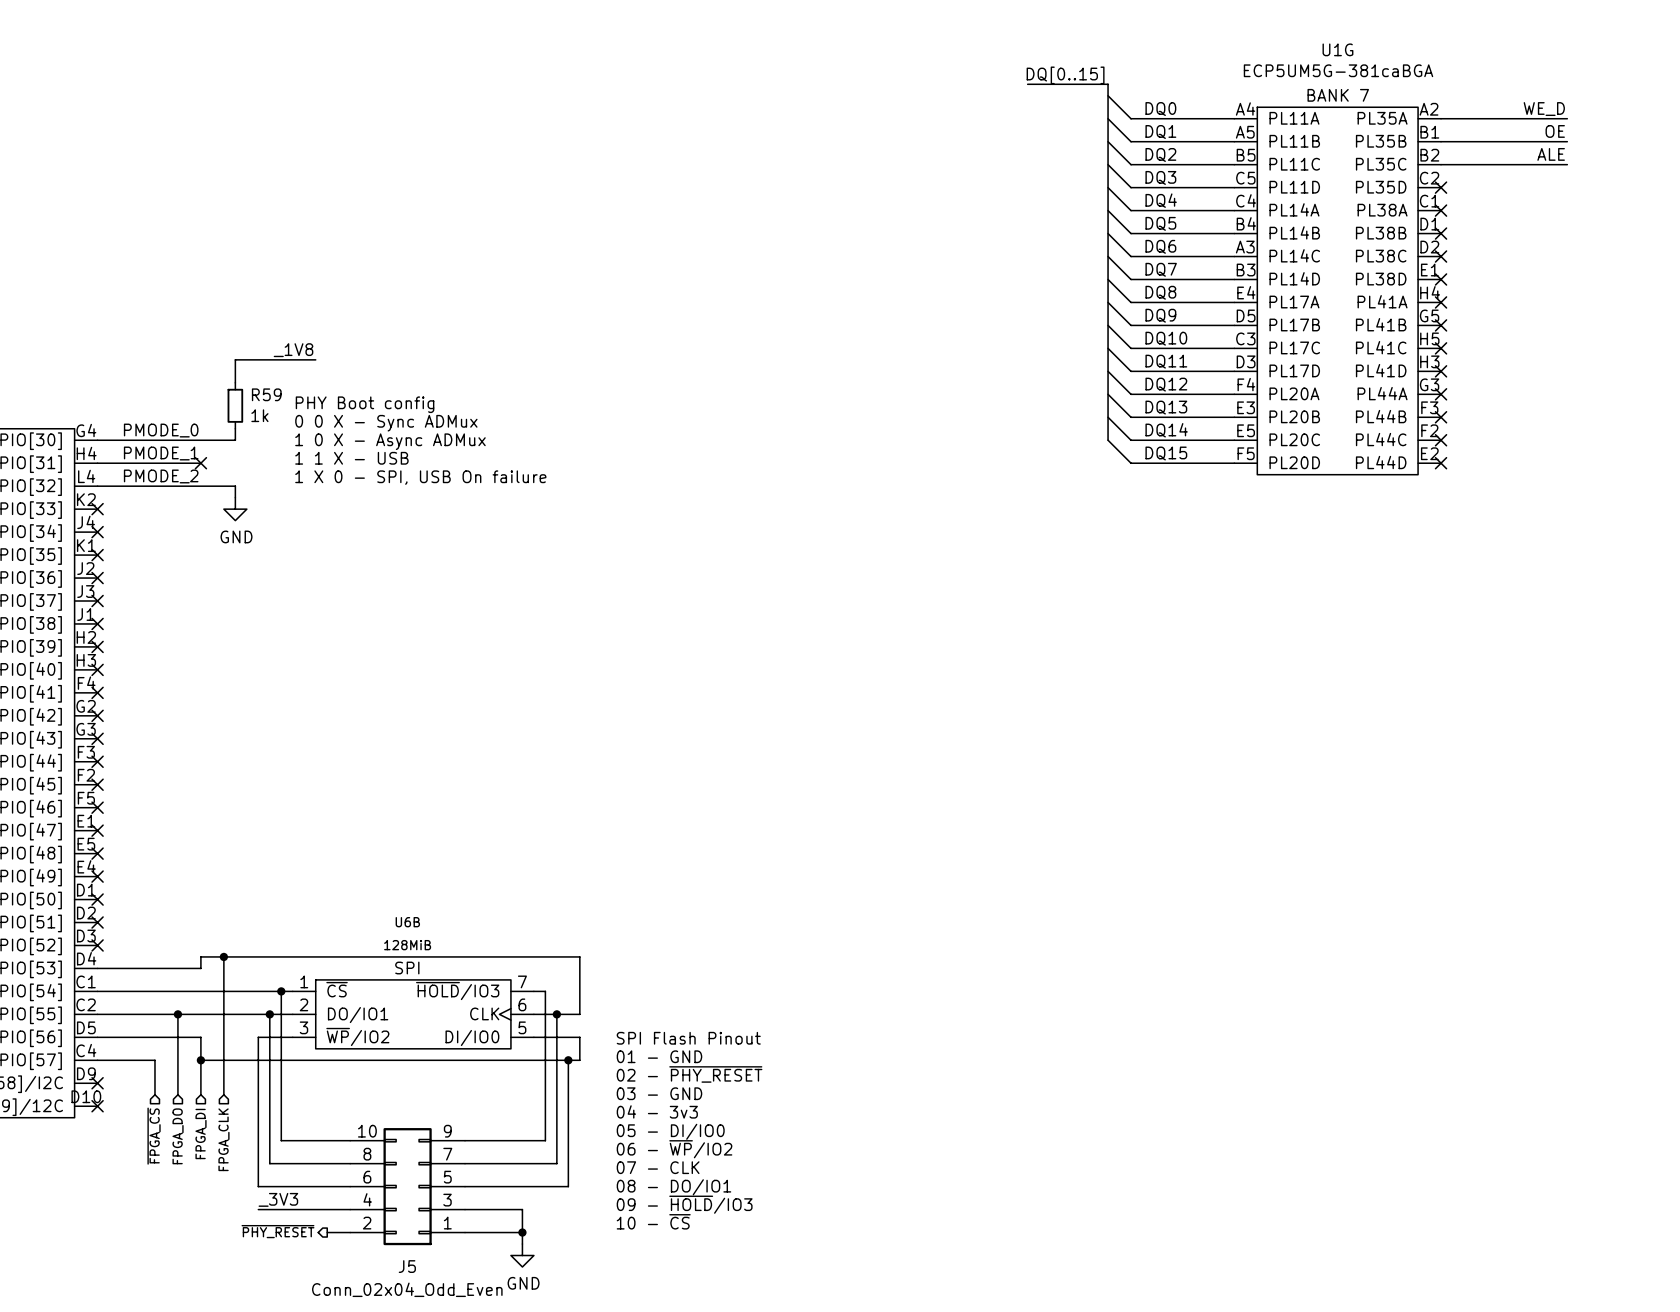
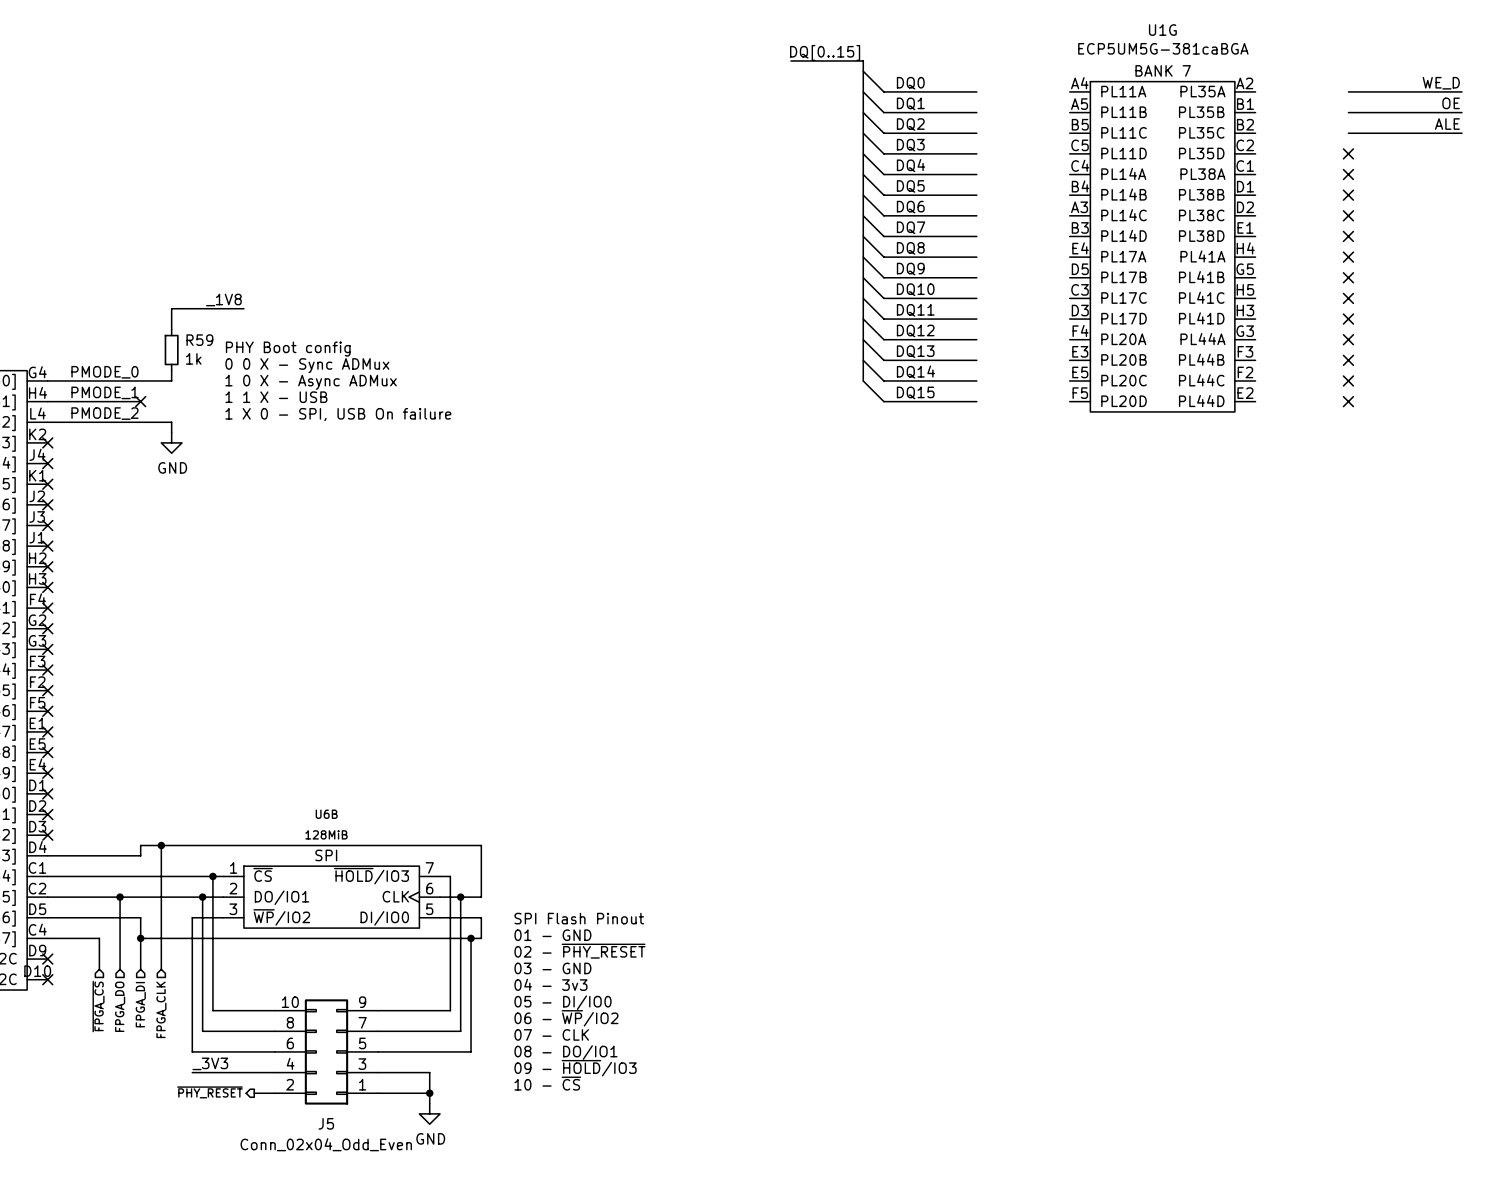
label position: DQ[0..15] (1065, 75) -> DQ[0..15] (825, 53)
bus: (1027, 84) (1108, 84) (1108, 440) -> (791, 60) (863, 60) (863, 380)
wire: (1108, 95) (1131, 118) (1234, 118) -> (863, 71) (883, 91) (976, 91)
label position: DQ0 (1160, 109) -> DQ0 (910, 83)
label position: WE_D (1544, 109) -> WE_D (1441, 83)
wire: (1108, 118) (1131, 141) (1234, 141) -> (863, 91) (883, 112) (976, 112)
wire: (1441, 118) (1544, 118) -> (1369, 91) (1461, 91)
label position: OE (1555, 131) -> OE (1451, 103)
label position: DQ1 (1160, 132) -> DQ1 (910, 103)
wire: (1108, 141) (1131, 164) (1234, 164) -> (863, 112) (883, 133) (976, 133)
wire: (1441, 141) (1544, 141) -> (1369, 112) (1461, 112)
label position: DQ2 (1160, 154) -> DQ2 (910, 124)
label position: ALE (1551, 154) -> ALE (1447, 124)
wire: (1108, 164) (1131, 187) (1234, 187) -> (863, 133) (883, 153) (976, 153)
wire: (1441, 164) (1544, 164) -> (1369, 133) (1461, 133)
label position: DQ3 (1160, 177) -> DQ3 (910, 145)
wire: (1108, 187) (1131, 210) (1234, 210) -> (863, 153) (883, 174) (976, 174)
no-connect mark: (1441, 187) -> none
no-connect mark: none -> (1348, 153)
label position: DQ4 (1161, 200) -> DQ4 (911, 165)
wire: (1108, 210) (1131, 233) (1234, 233) -> (863, 174) (883, 195) (976, 195)
no-connect mark: (1441, 210) -> none
no-connect mark: none -> (1348, 174)
label position: DQ5 (1160, 223) -> DQ5 (910, 186)
wire: (1108, 233) (1131, 256) (1234, 256) -> (863, 195) (883, 215) (976, 215)
no-connect mark: (1441, 233) -> none
no-connect mark: none -> (1348, 195)
label position: DQ6 (1160, 246) -> DQ6 (910, 207)
wire: (1108, 256) (1131, 279) (1234, 279) -> (863, 215) (883, 236) (976, 236)
no-connect mark: (1441, 256) -> none
no-connect mark: none -> (1348, 215)
label position: DQ7 (1161, 269) -> DQ7 (911, 227)
wire: (1108, 279) (1131, 302) (1234, 302) -> (863, 236) (883, 257) (976, 257)
no-connect mark: (1441, 279) -> none
no-connect mark: none -> (1348, 236)
label position: DQ8 (1160, 292) -> DQ8 (910, 248)
wire: (1108, 302) (1131, 325) (1234, 325) -> (863, 257) (883, 277) (976, 277)
no-connect mark: (1441, 302) -> none
no-connect mark: none -> (1348, 257)
label position: DQ9 (1160, 315) -> DQ9 (910, 269)
wire: (1108, 325) (1131, 348) (1234, 348) -> (863, 277) (883, 298) (976, 298)
no-connect mark: (1441, 325) -> none
no-connect mark: none -> (1348, 277)
label position: DQ10 (1166, 338) -> DQ10 (915, 289)
wire: (1108, 348) (1131, 371) (1234, 371) -> (863, 298) (883, 319) (976, 319)
no-connect mark: (1441, 348) -> none
no-connect mark: none -> (1348, 298)
label position: DQ11 (1166, 361) -> DQ11 (915, 310)
wire: (1108, 371) (1131, 394) (1234, 394) -> (863, 319) (883, 339) (976, 339)
no-connect mark: (1441, 371) -> none
no-connect mark: none -> (1348, 319)
label position: DQ12 (1166, 384) -> DQ12 (915, 330)
wire: (1108, 394) (1131, 417) (1234, 417) -> (863, 339) (883, 360) (976, 360)
no-connect mark: (1441, 394) -> none
no-connect mark: none -> (1348, 339)
label position: DQ13 (1166, 407) -> DQ13 (915, 351)
wire: (1108, 417) (1131, 440) (1234, 440) -> (863, 360) (883, 380) (976, 380)
no-connect mark: (1441, 417) -> none
no-connect mark: none -> (1348, 360)
label position: DQ14 (1166, 430) -> DQ14 (915, 372)
wire: (1108, 440) (1131, 463) (1234, 463) -> (863, 380) (883, 401) (976, 401)
no-connect mark: (1441, 440) -> none
no-connect mark: none -> (1348, 380)
label position: DQ15 (1166, 453) -> DQ15 (915, 392)
no-connect mark: (1441, 463) -> none
no-connect mark: none -> (1348, 401)

